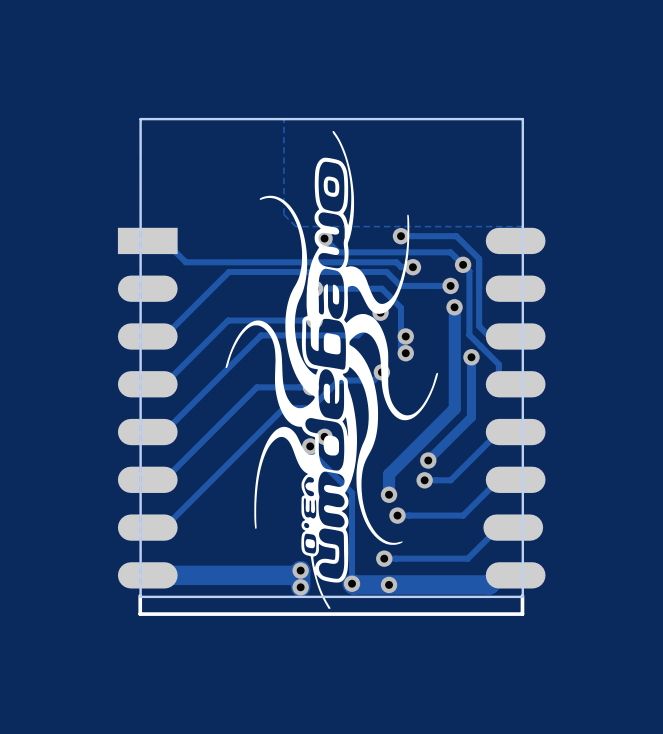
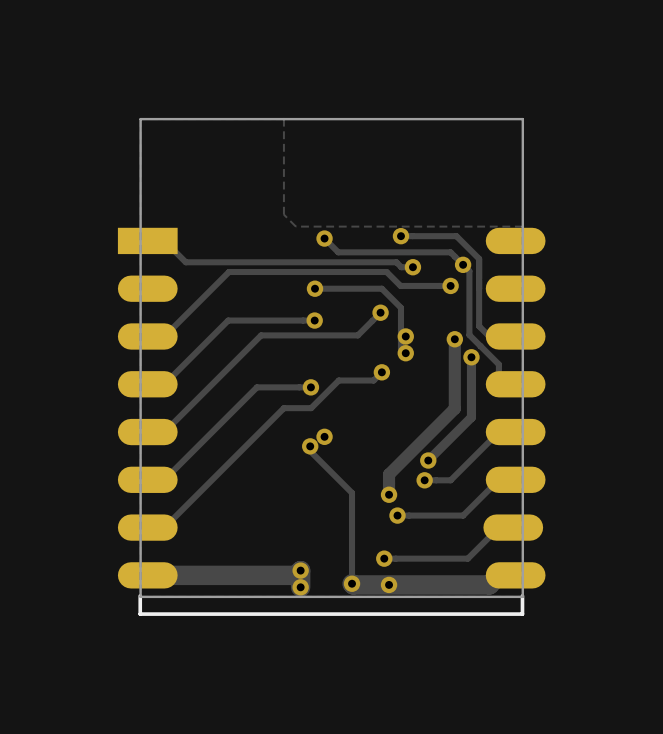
drawing: [225, 131, 438, 609] -> none
track: (454, 307) (454, 339) -> none
via position: (454, 307) -> (454, 339)

